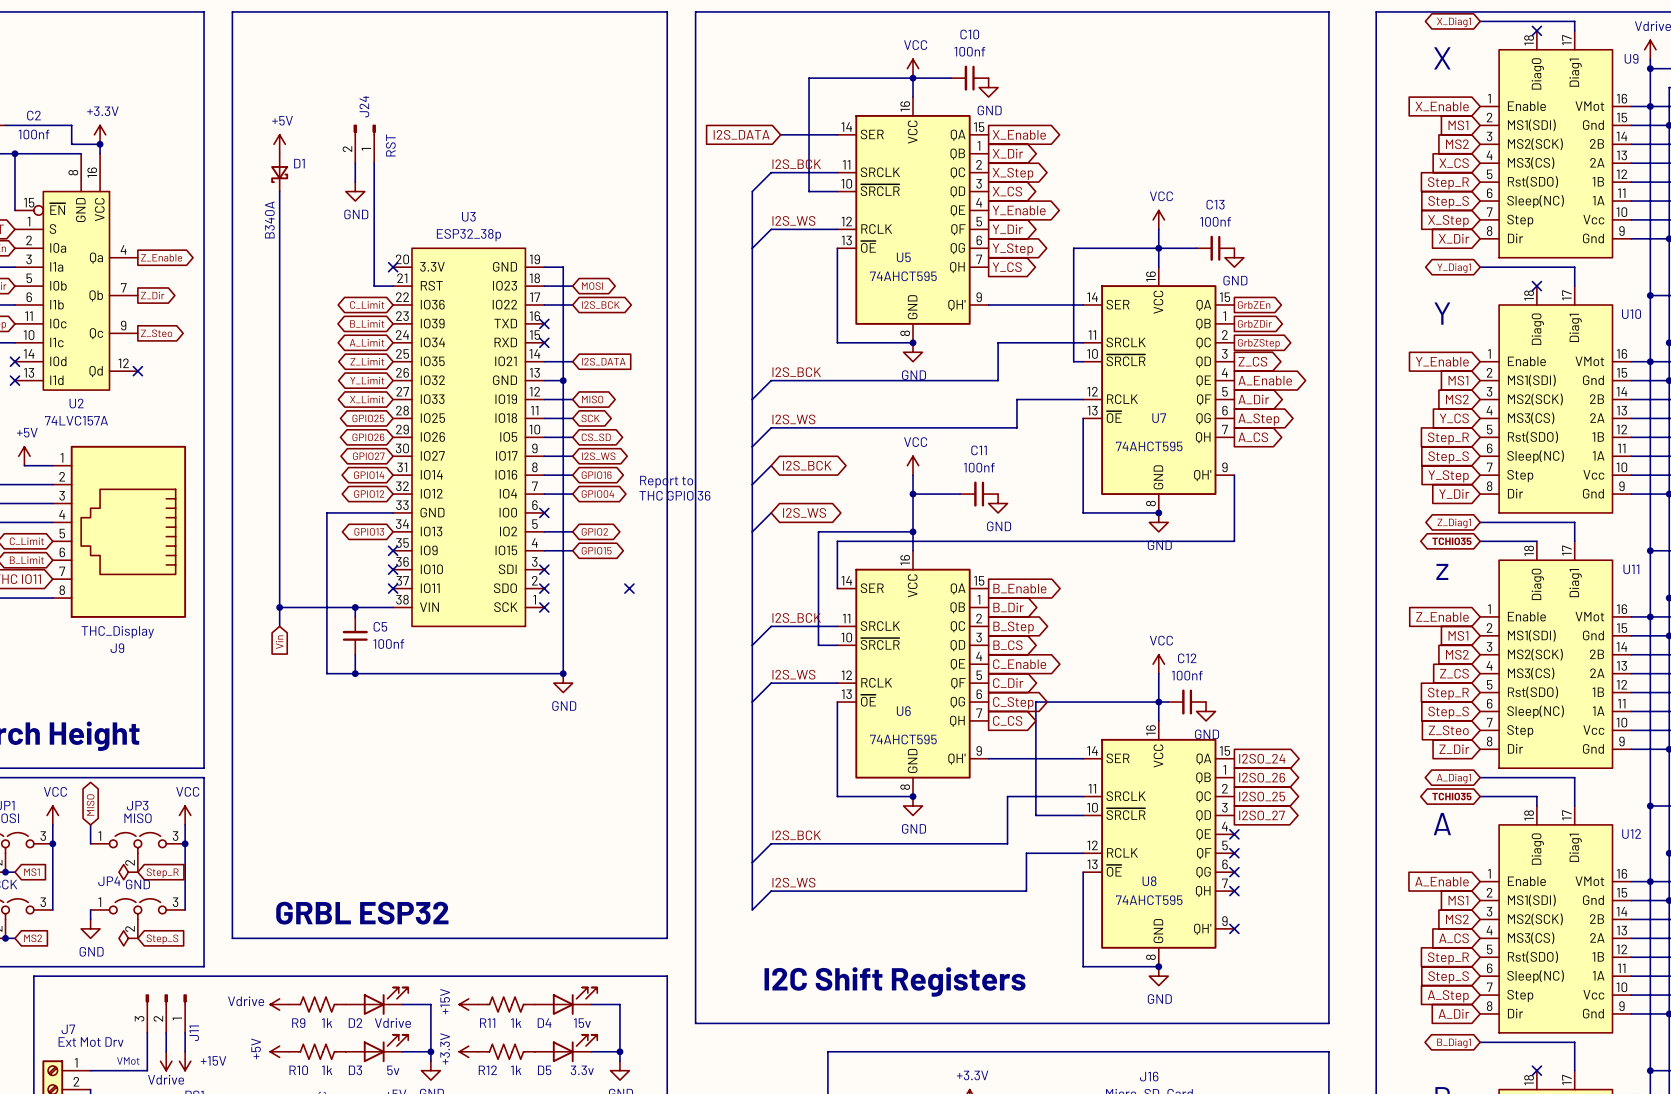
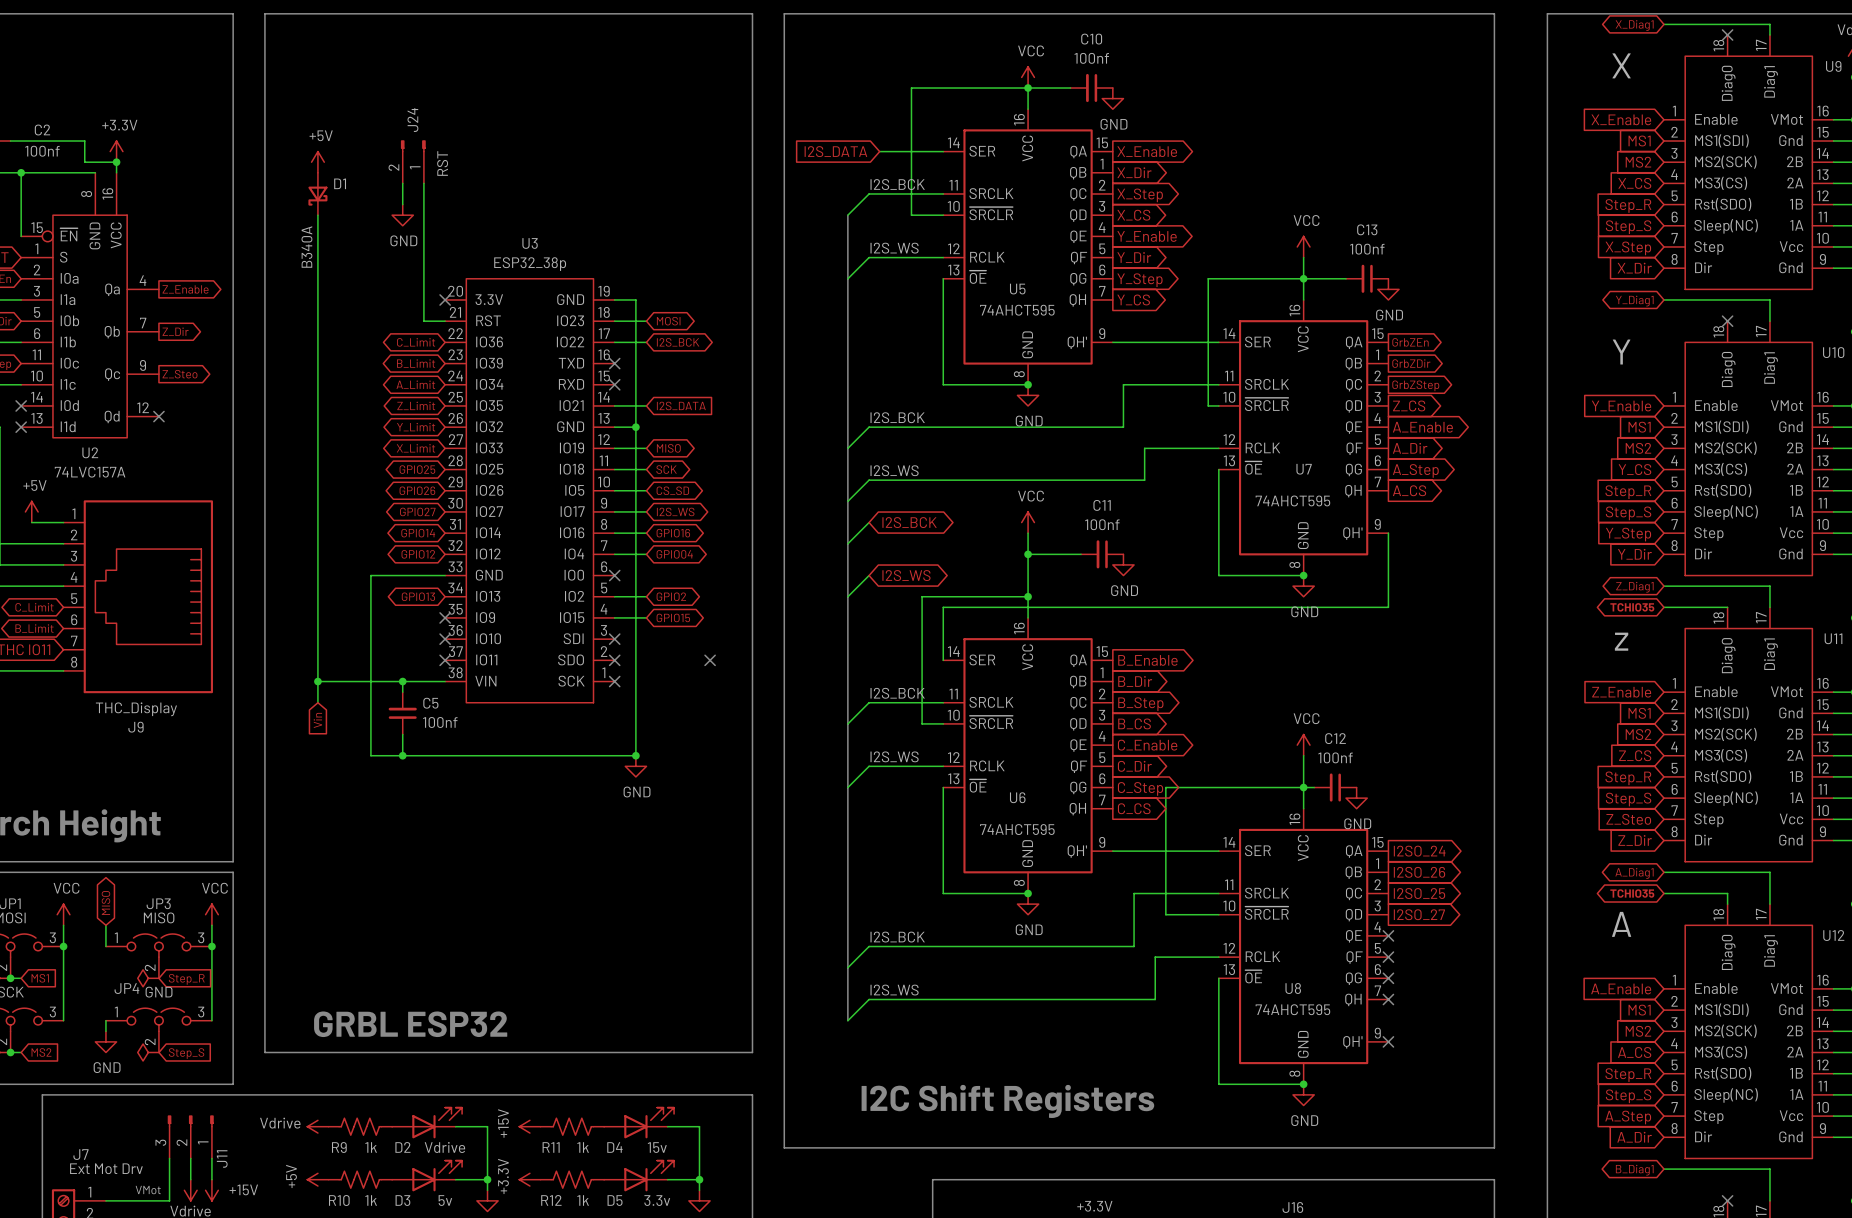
text: Report to (666, 481) -> none
text: THC GPIO 36 (674, 495) -> none

